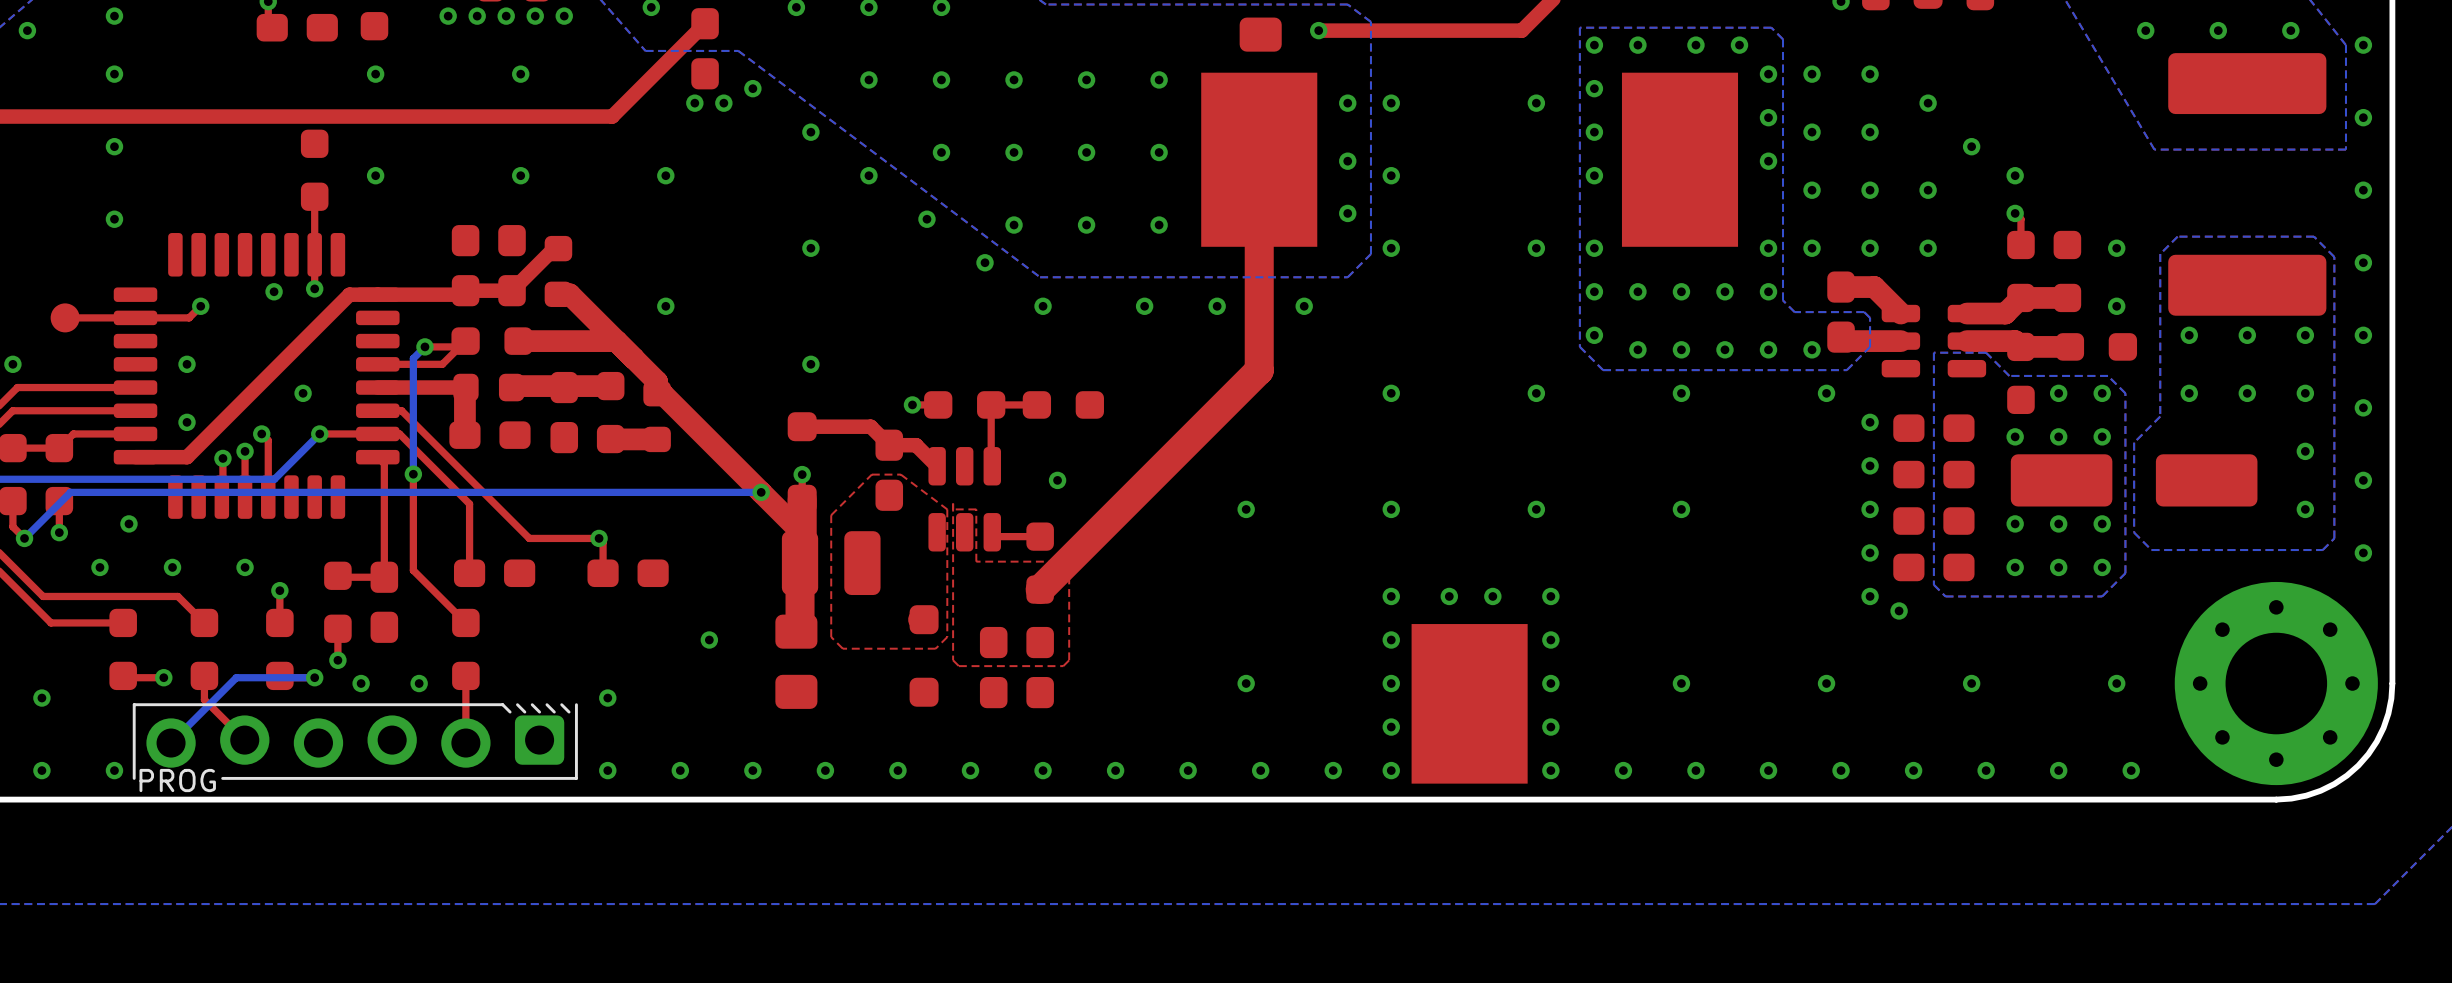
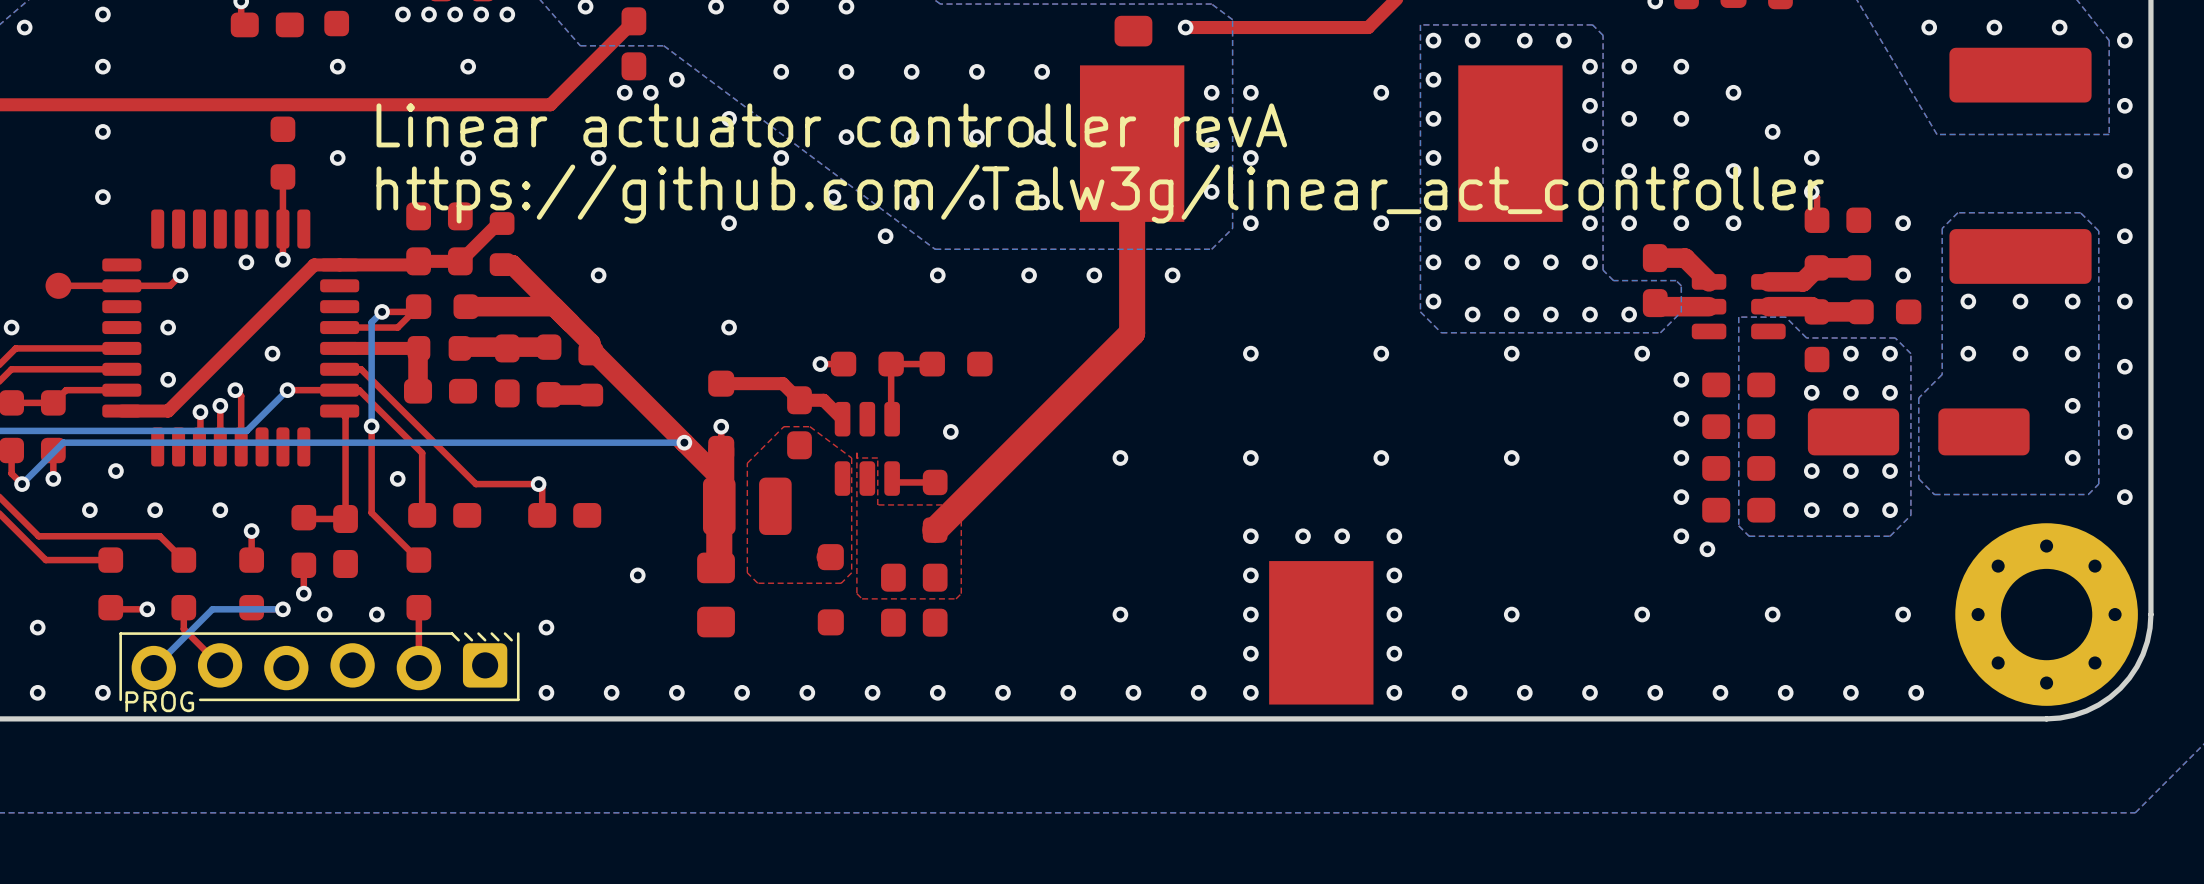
text: none -> Linear actuator controller revA (831, 125)
text: none -> https://github.com/Talw3g/linear_act_controller (1100, 193)
via: none -> (397, 478)

